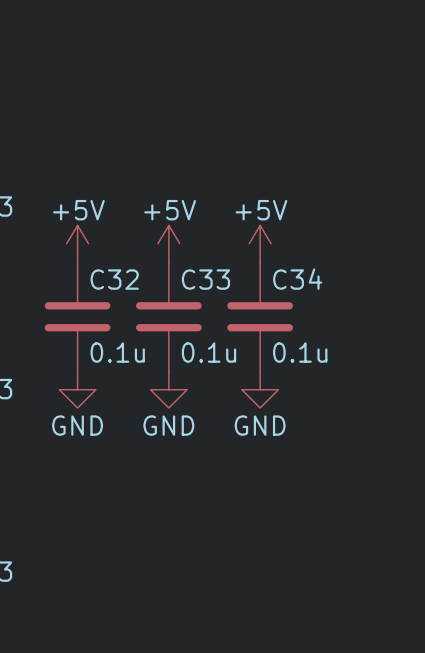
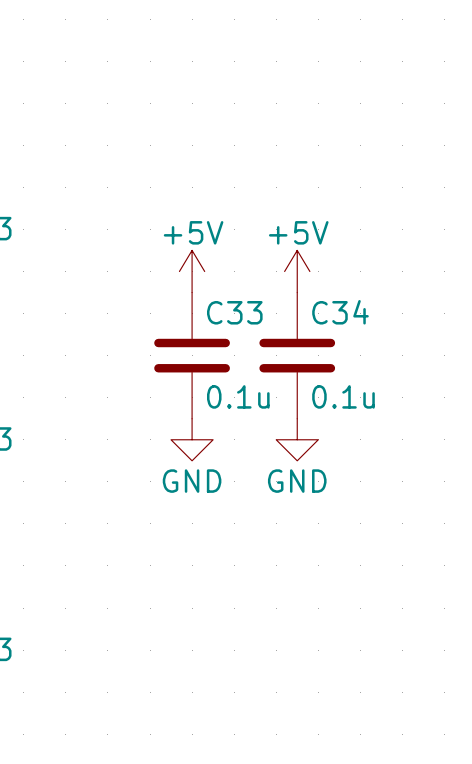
power symbol: +5V (77, 243) -> none
C32: 0.1u (77, 316) -> none
power symbol: GND (77, 389) -> none

